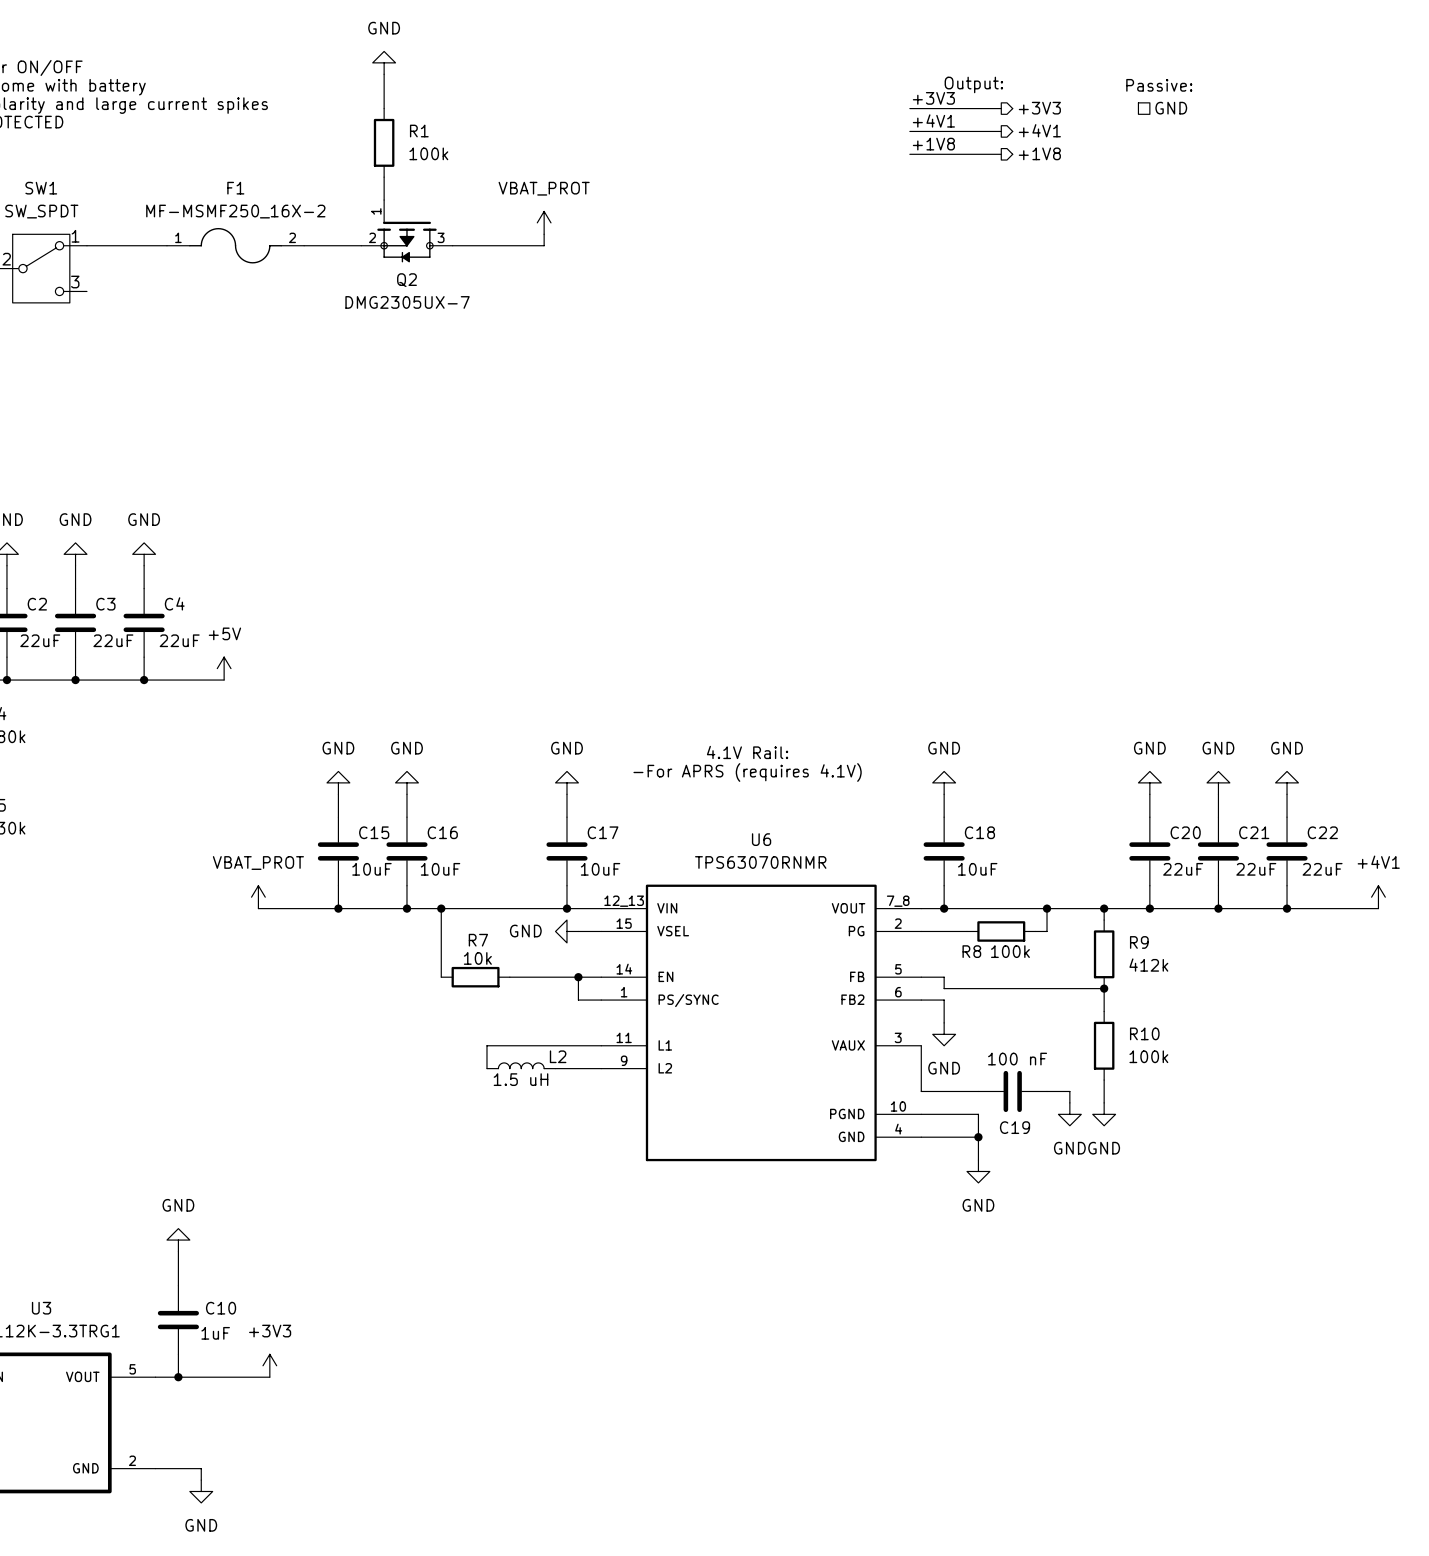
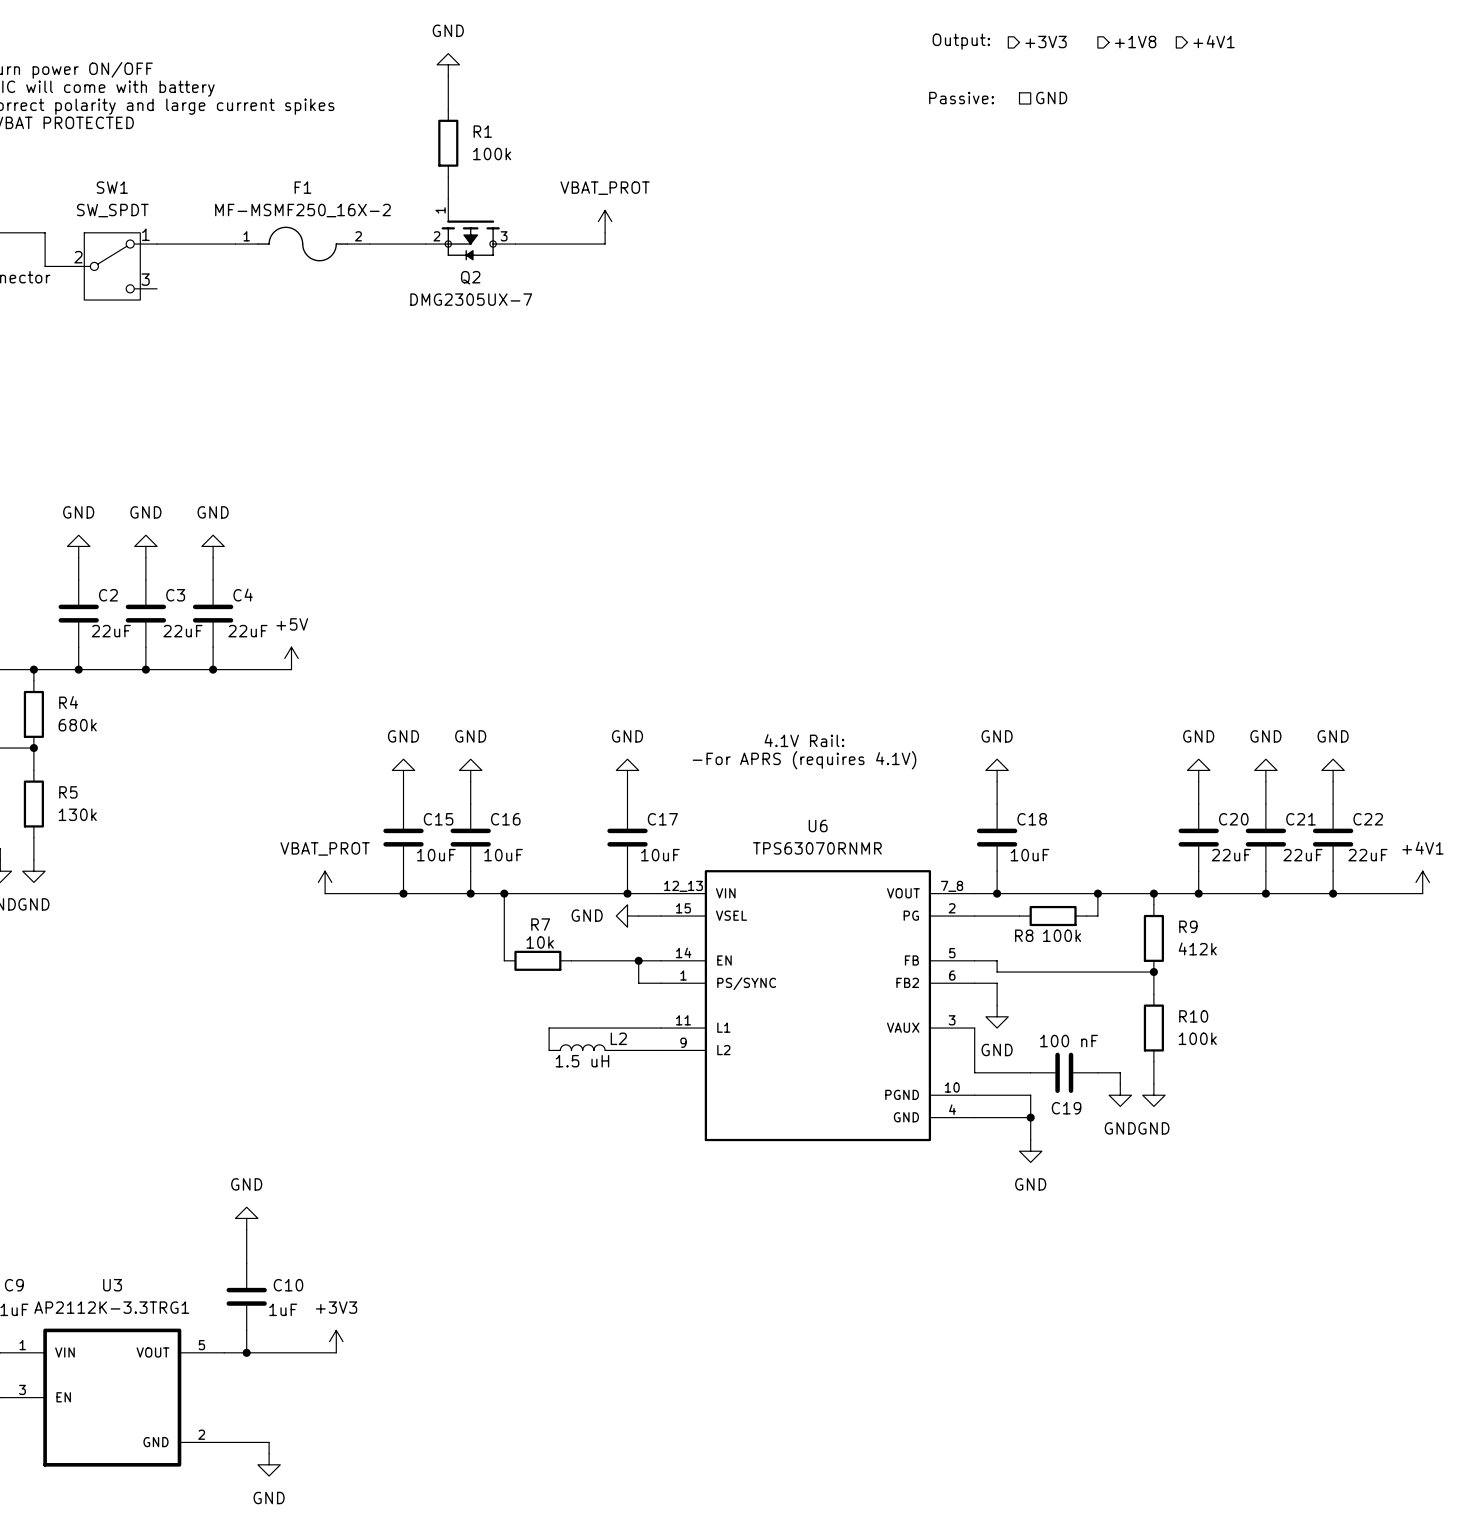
text position: Output: (973, 84) -> Output: (961, 41)
text: Passive: (1159, 85) -> none
text: none -> Passive: (961, 98)
label: +3V3 (933, 98) -> none
wire: (909, 108) (1001, 108) -> none
hierarchical label position: +3V3 (1039, 108) -> +3V3 (1046, 42)
hierarchical label position: GND (1171, 108) -> GND (1051, 98)
label: +4V1 (933, 120) -> none
hierarchical label position: +4V1 (1039, 130) -> +4V1 (1214, 41)
wire: (909, 131) (1001, 131) -> none
label: +1V8 (933, 144) -> none
hierarchical label position: +1V8 (1039, 153) -> +1V8 (1135, 42)
wire: (909, 154) (1001, 154) -> none

